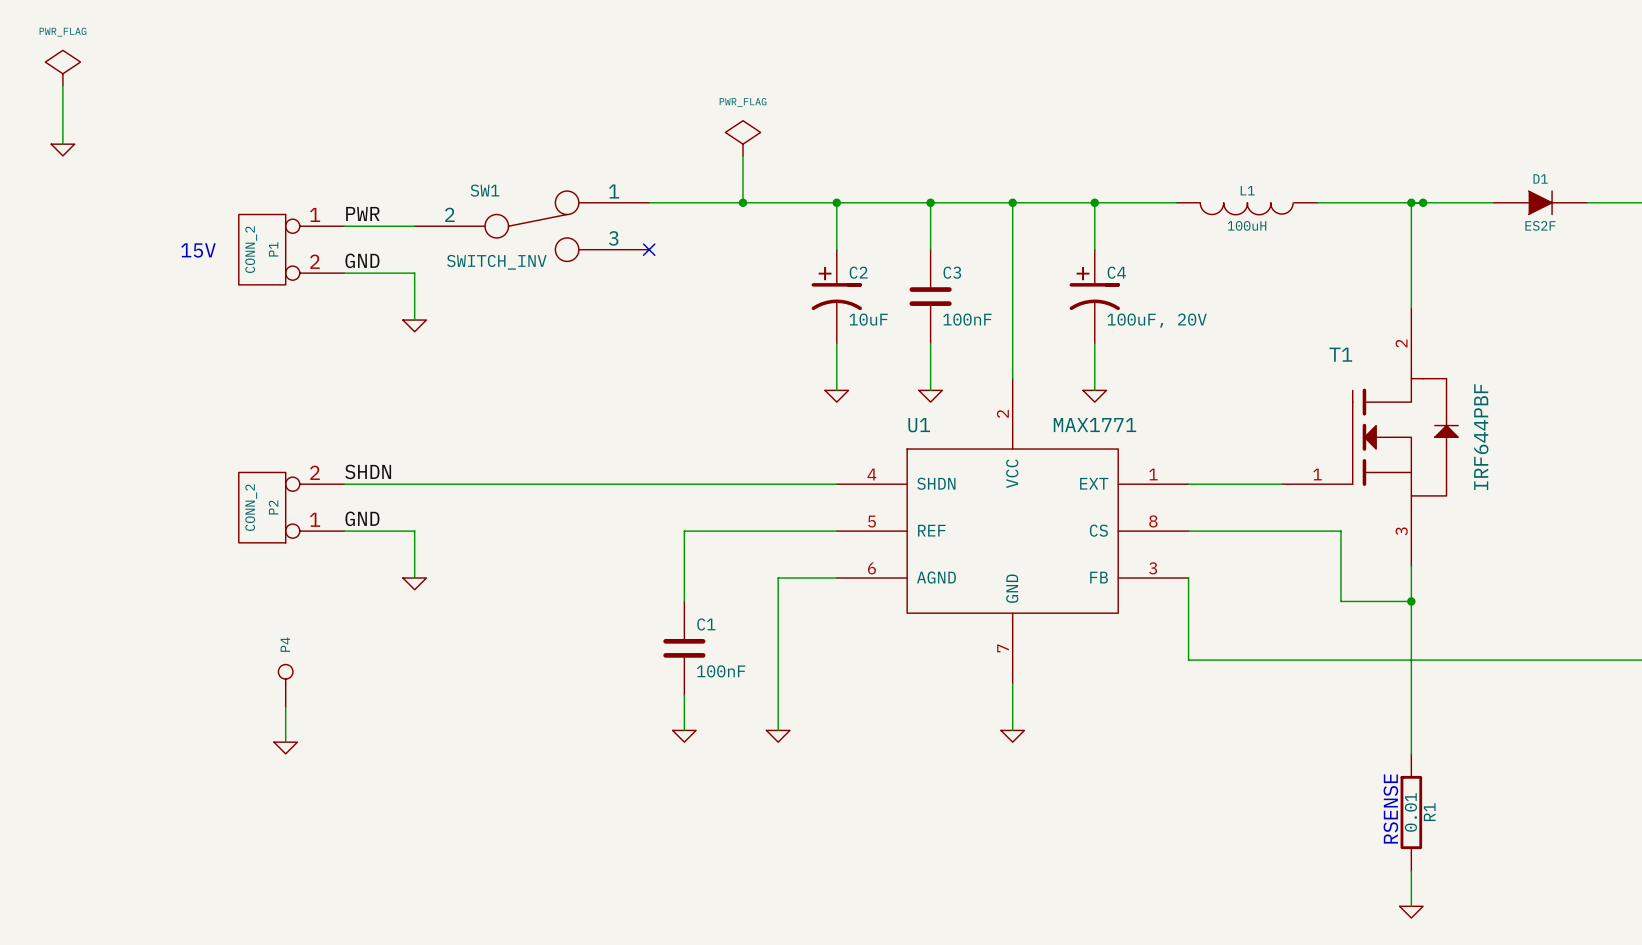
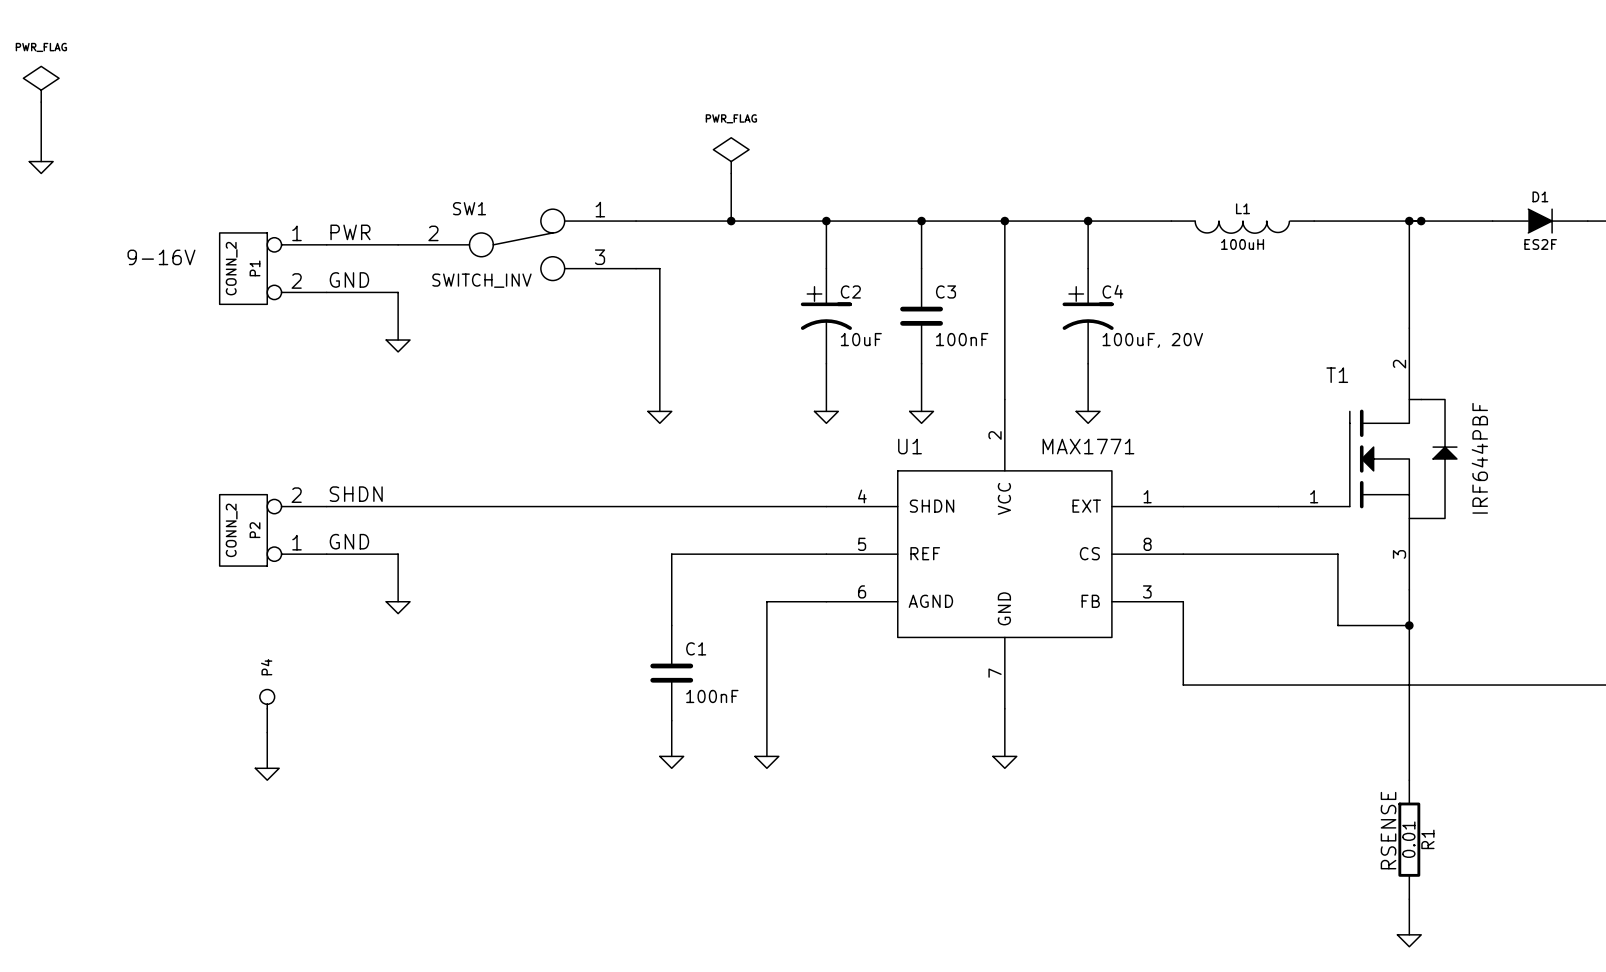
text: none -> 9-16V (161, 257)
wire: none -> (636, 268) (659, 268) (659, 411)
no-connect mark: (649, 249) -> none
text: 15V (198, 250) -> none
power symbol: none -> (659, 417)

